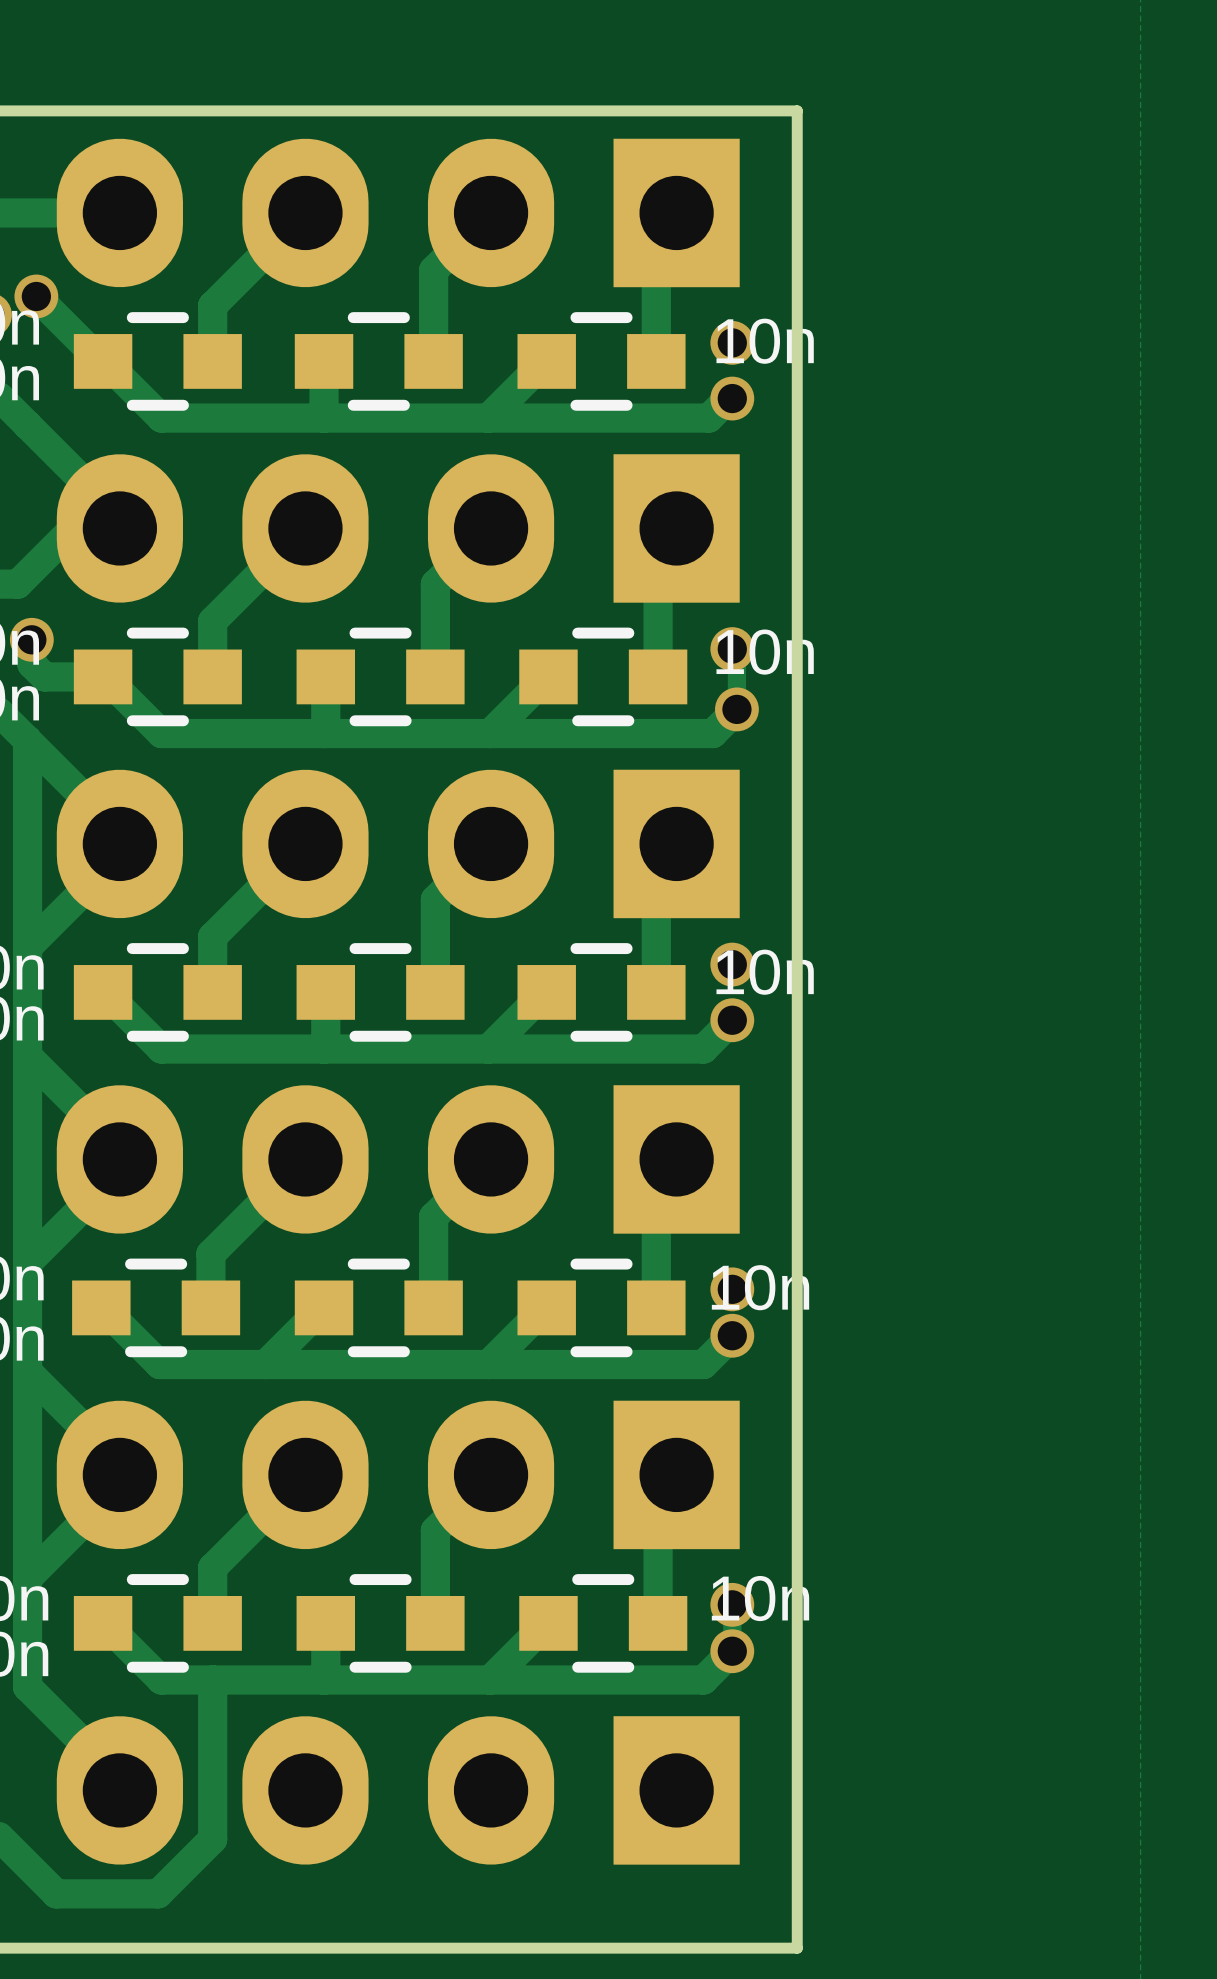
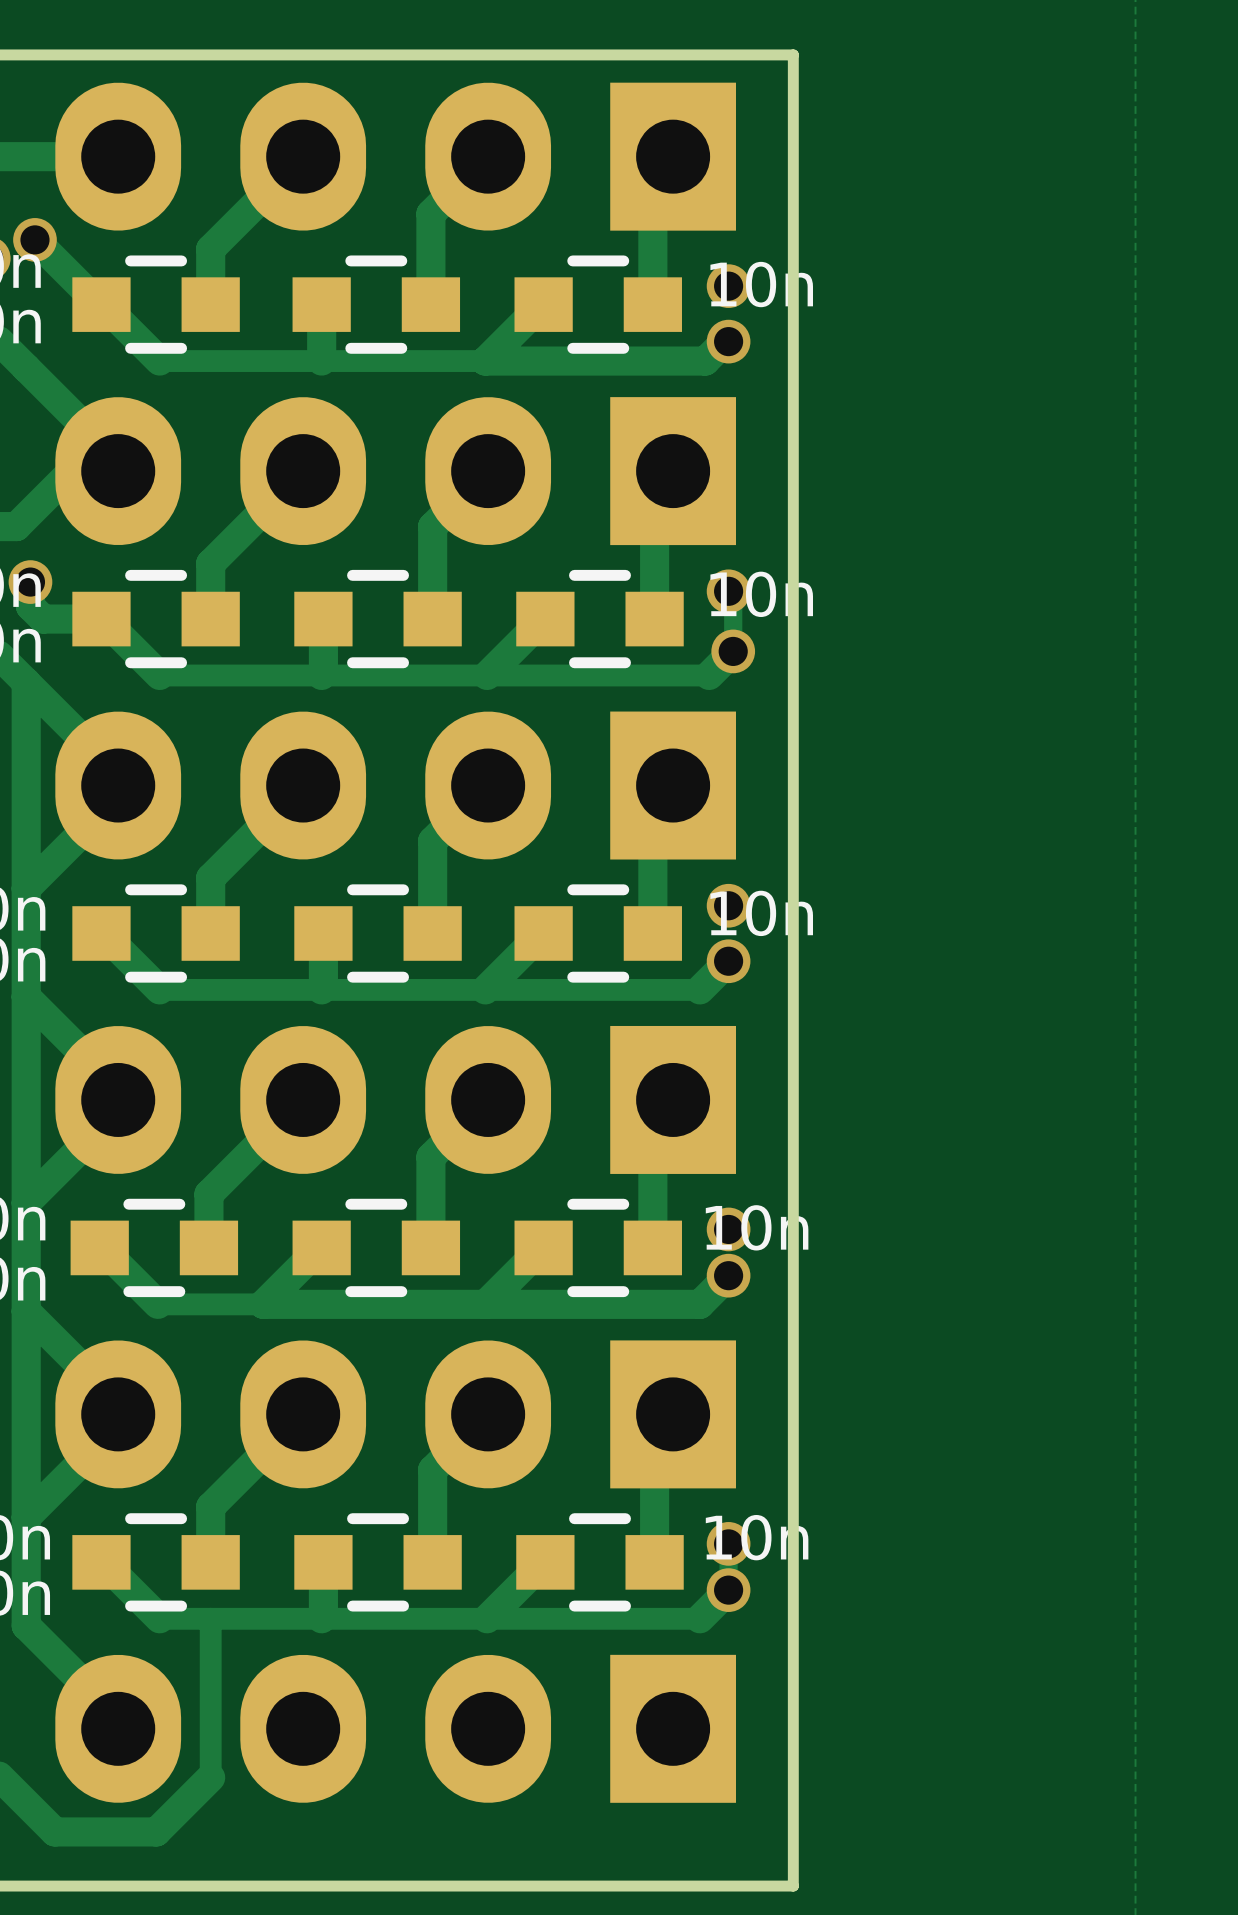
track width: thick (488, 418) (161, 418) -> thin (485, 361) (159, 361)
track width: thick (712, 733) (161, 733) -> thin (709, 675) (159, 675)
track width: thick (703, 1049) (161, 1049) -> thin (699, 989) (159, 989)
track width: thick (159, 1364) (265, 1364) -> thin (157, 1304) (263, 1304)
track width: thick (212, 1680) (212, 1839) -> thin (210, 1618) (210, 1777)
track width: thick (703, 1680) (161, 1680) -> thin (699, 1618) (159, 1618)

